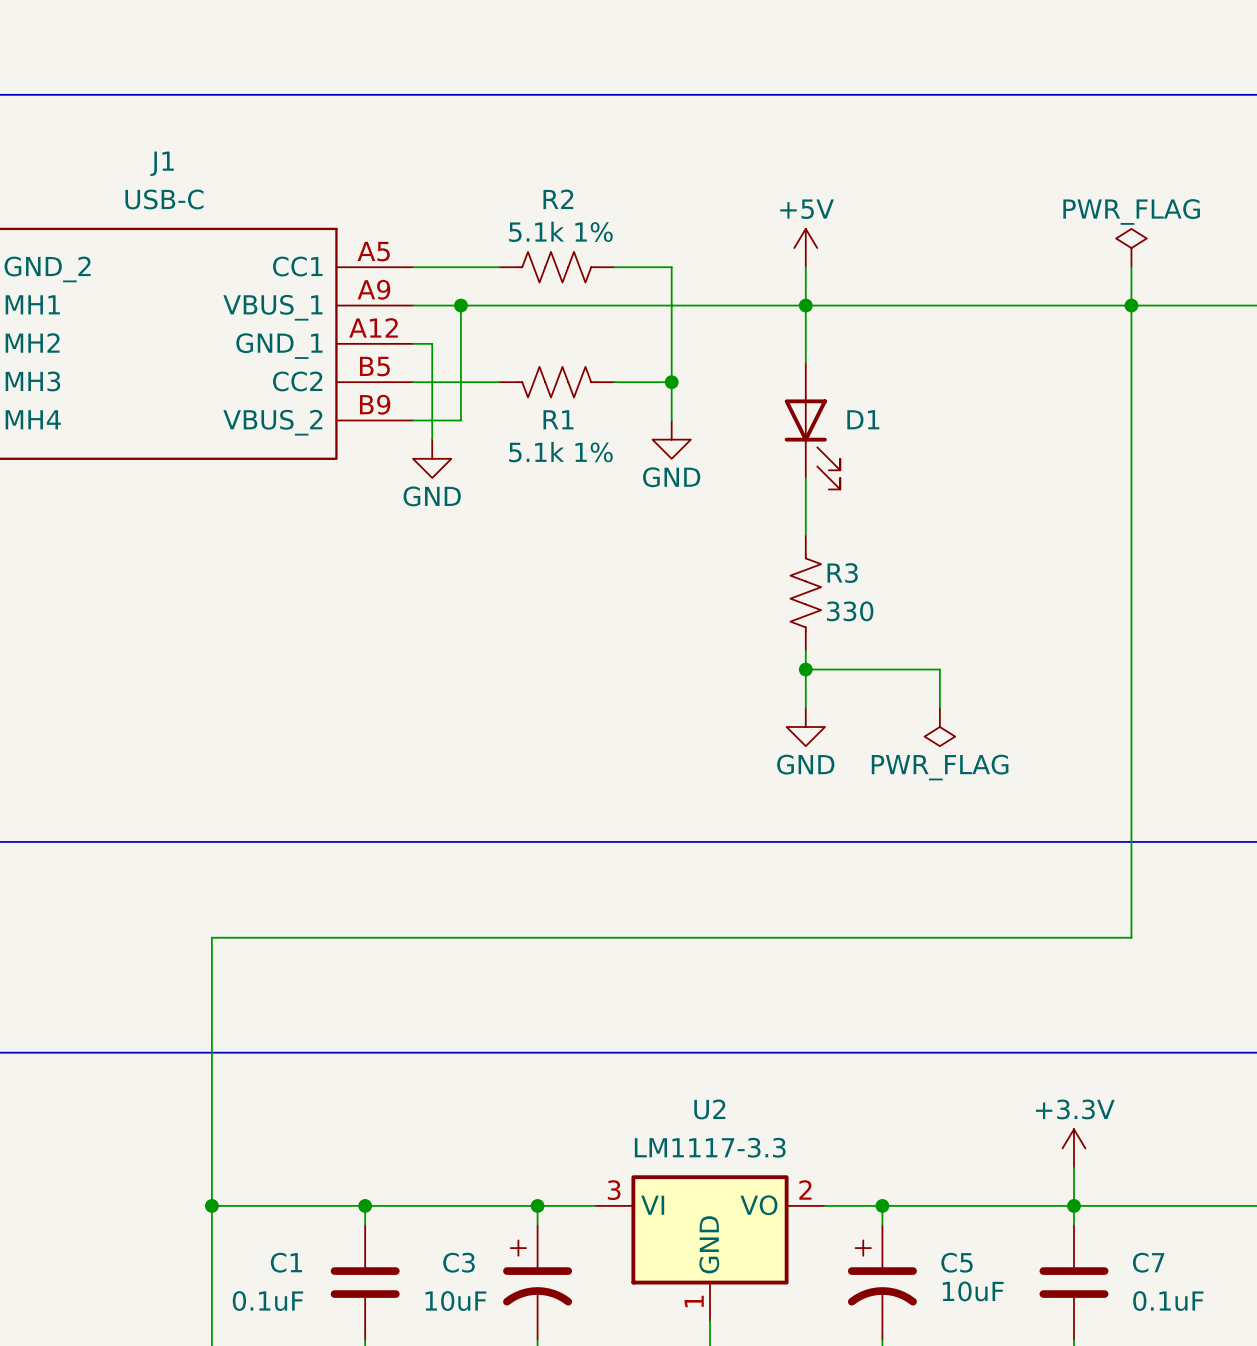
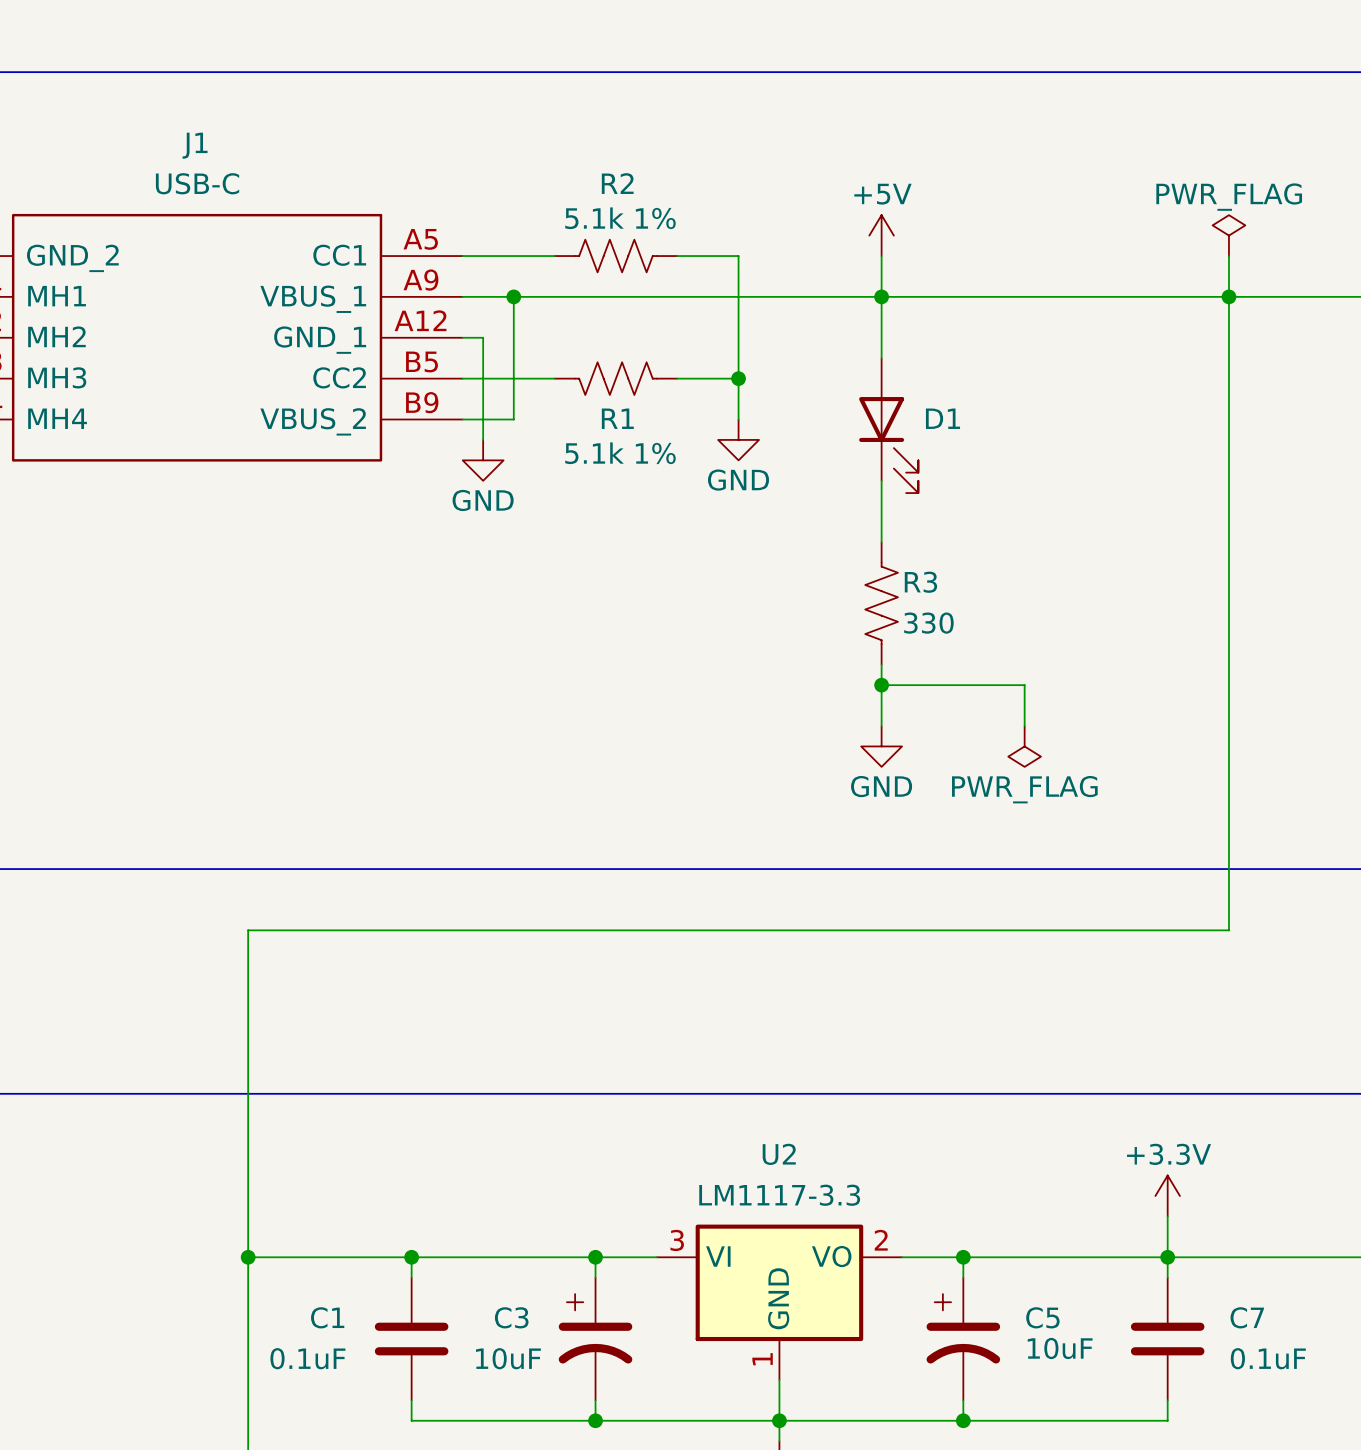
wire: (1131, 899) (1131, 937) (211, 937) -> (1228, 930) (248, 930) (248, 971)

